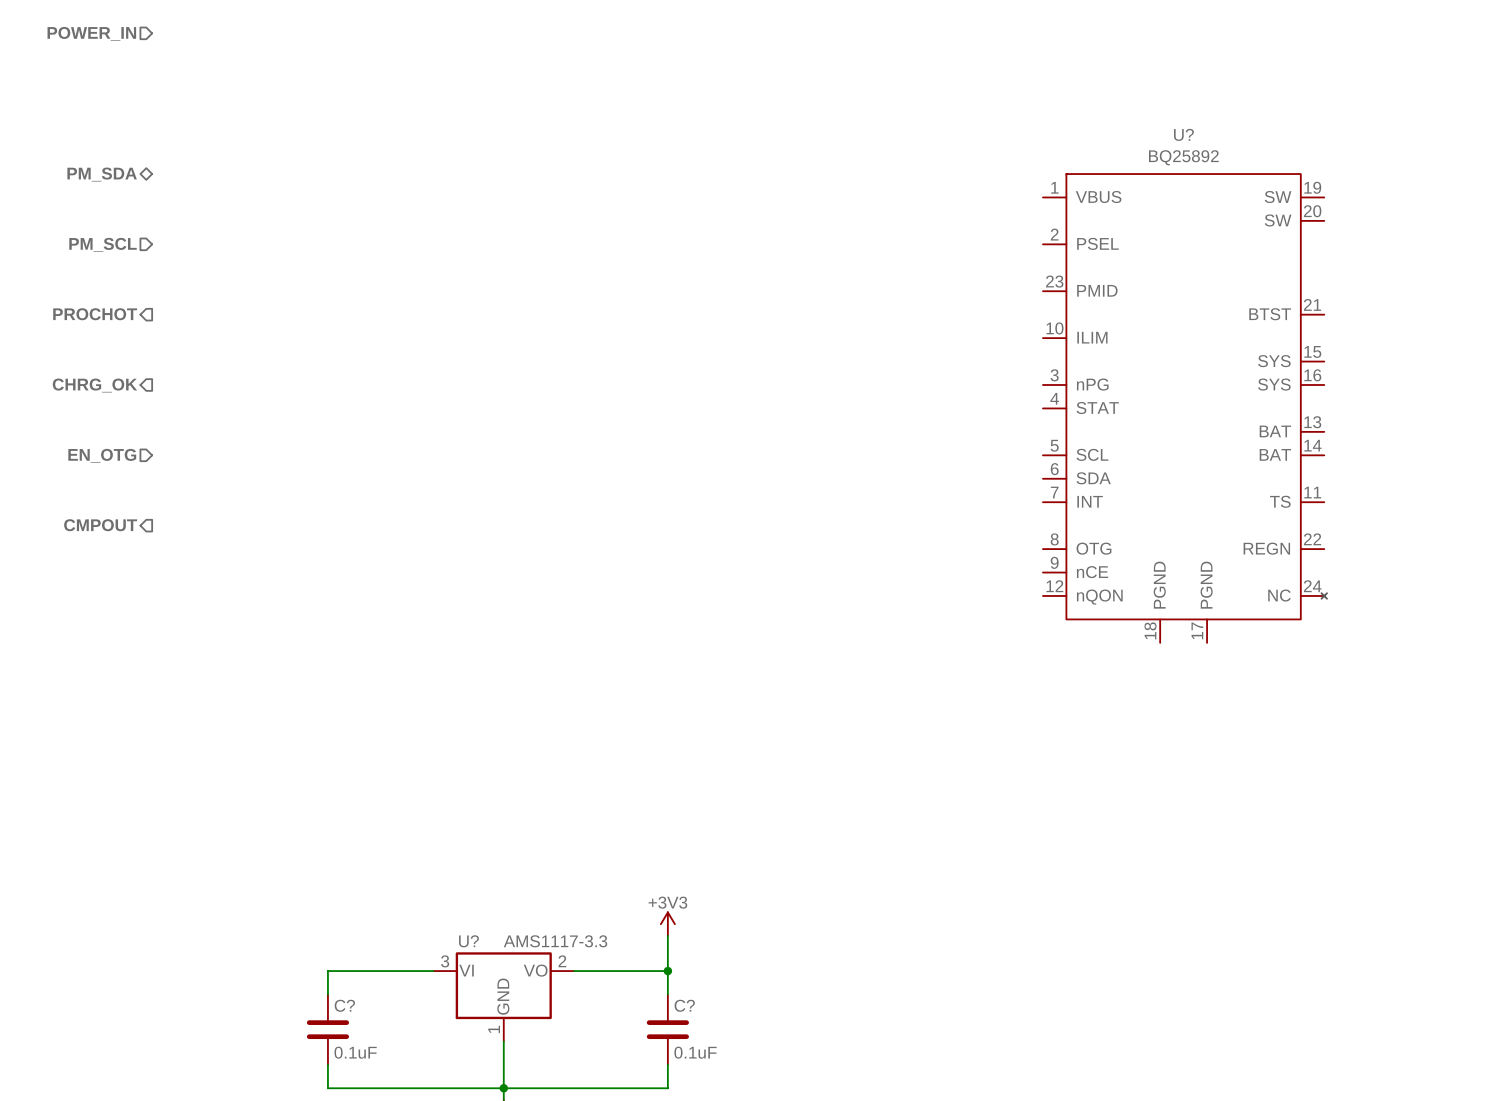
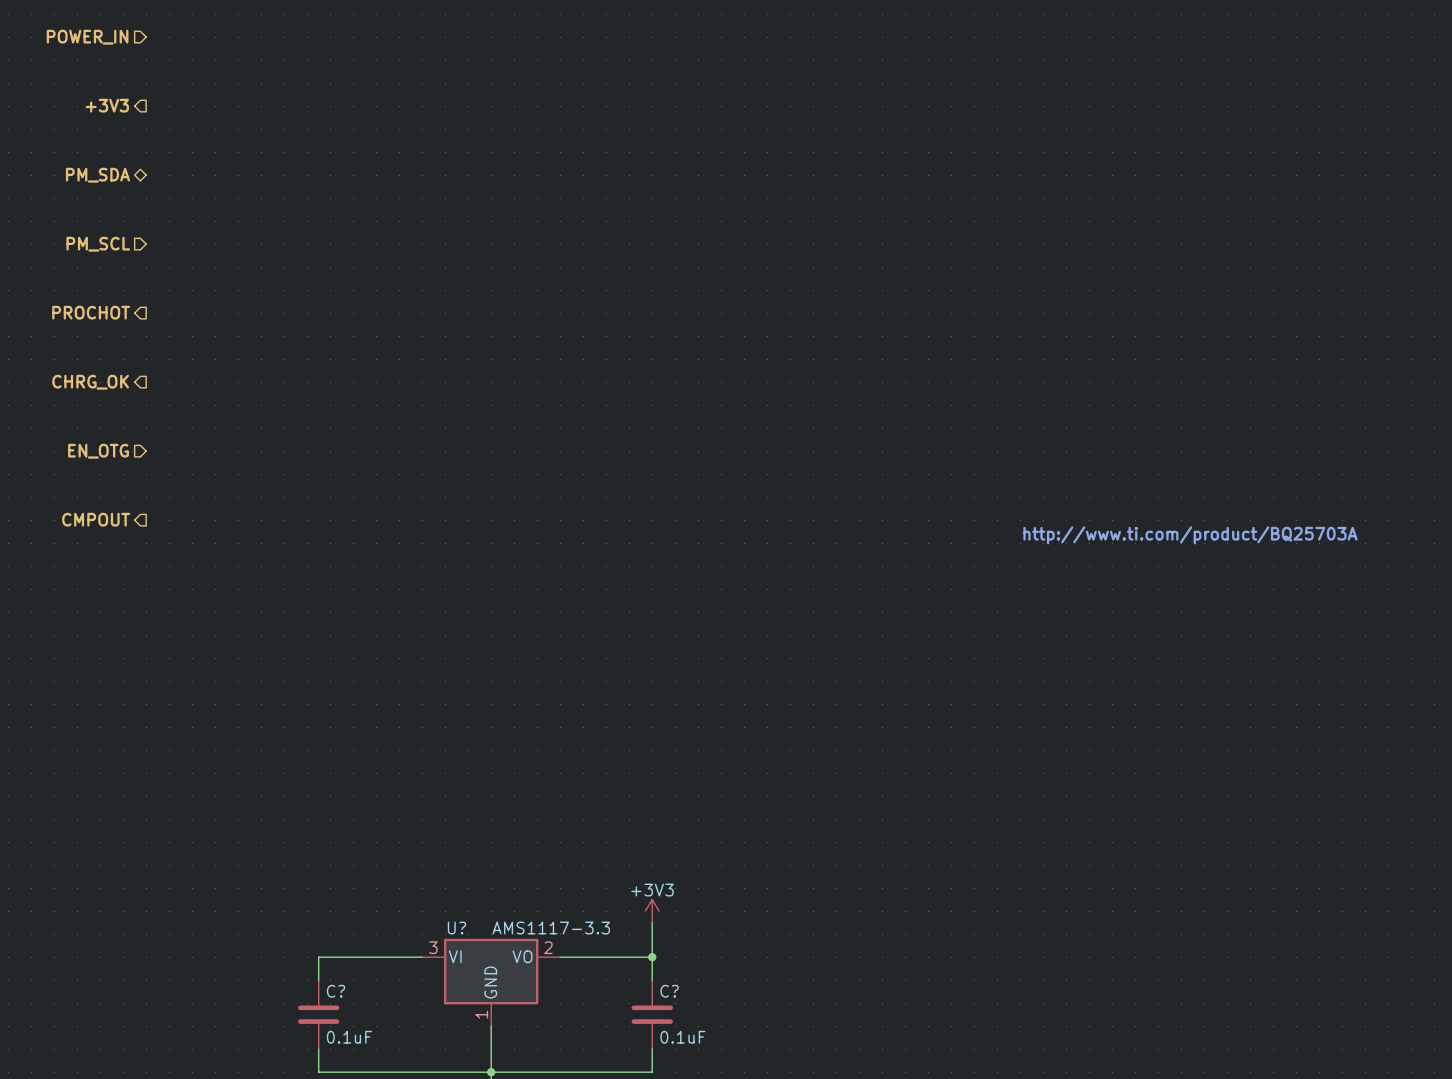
hierarchical label: none -> +3V3 (107, 105)
U?: BQ25892 (1184, 408) -> none
text: none -> http://www.ti.com/product/BQ25703A (1190, 535)

